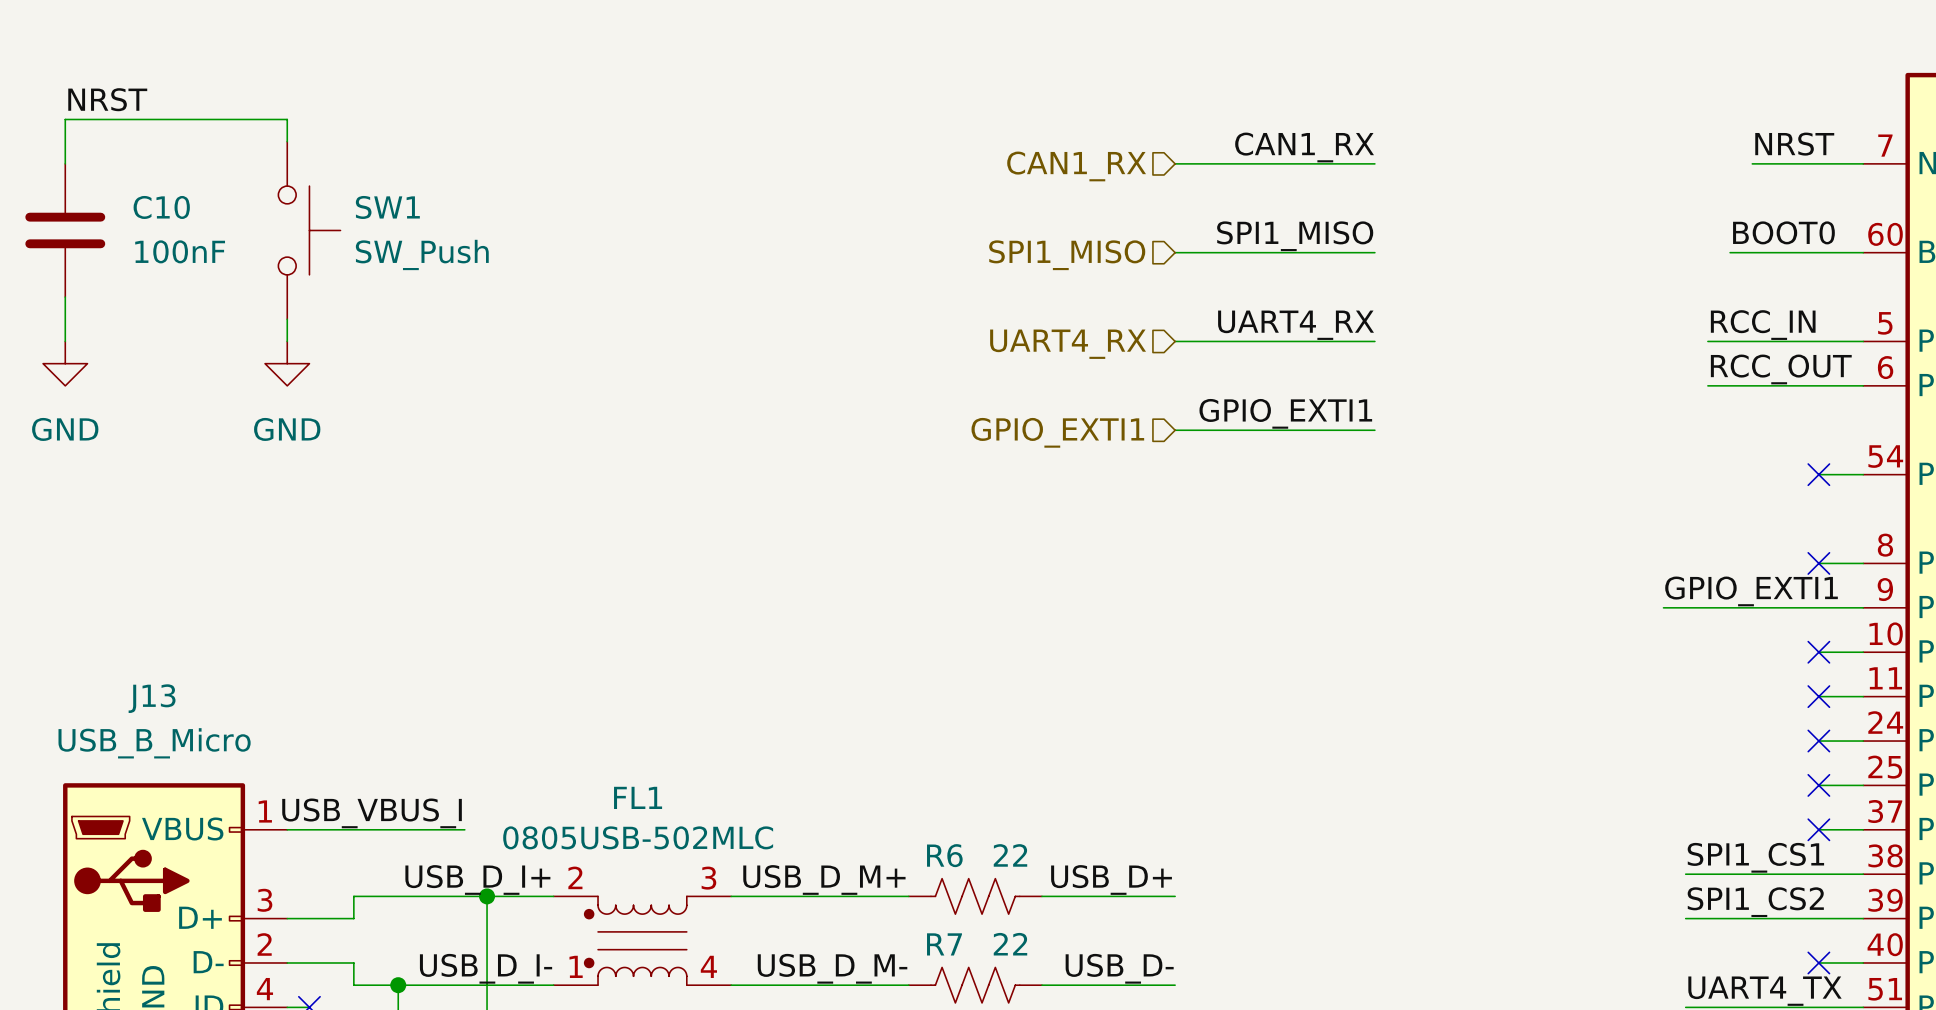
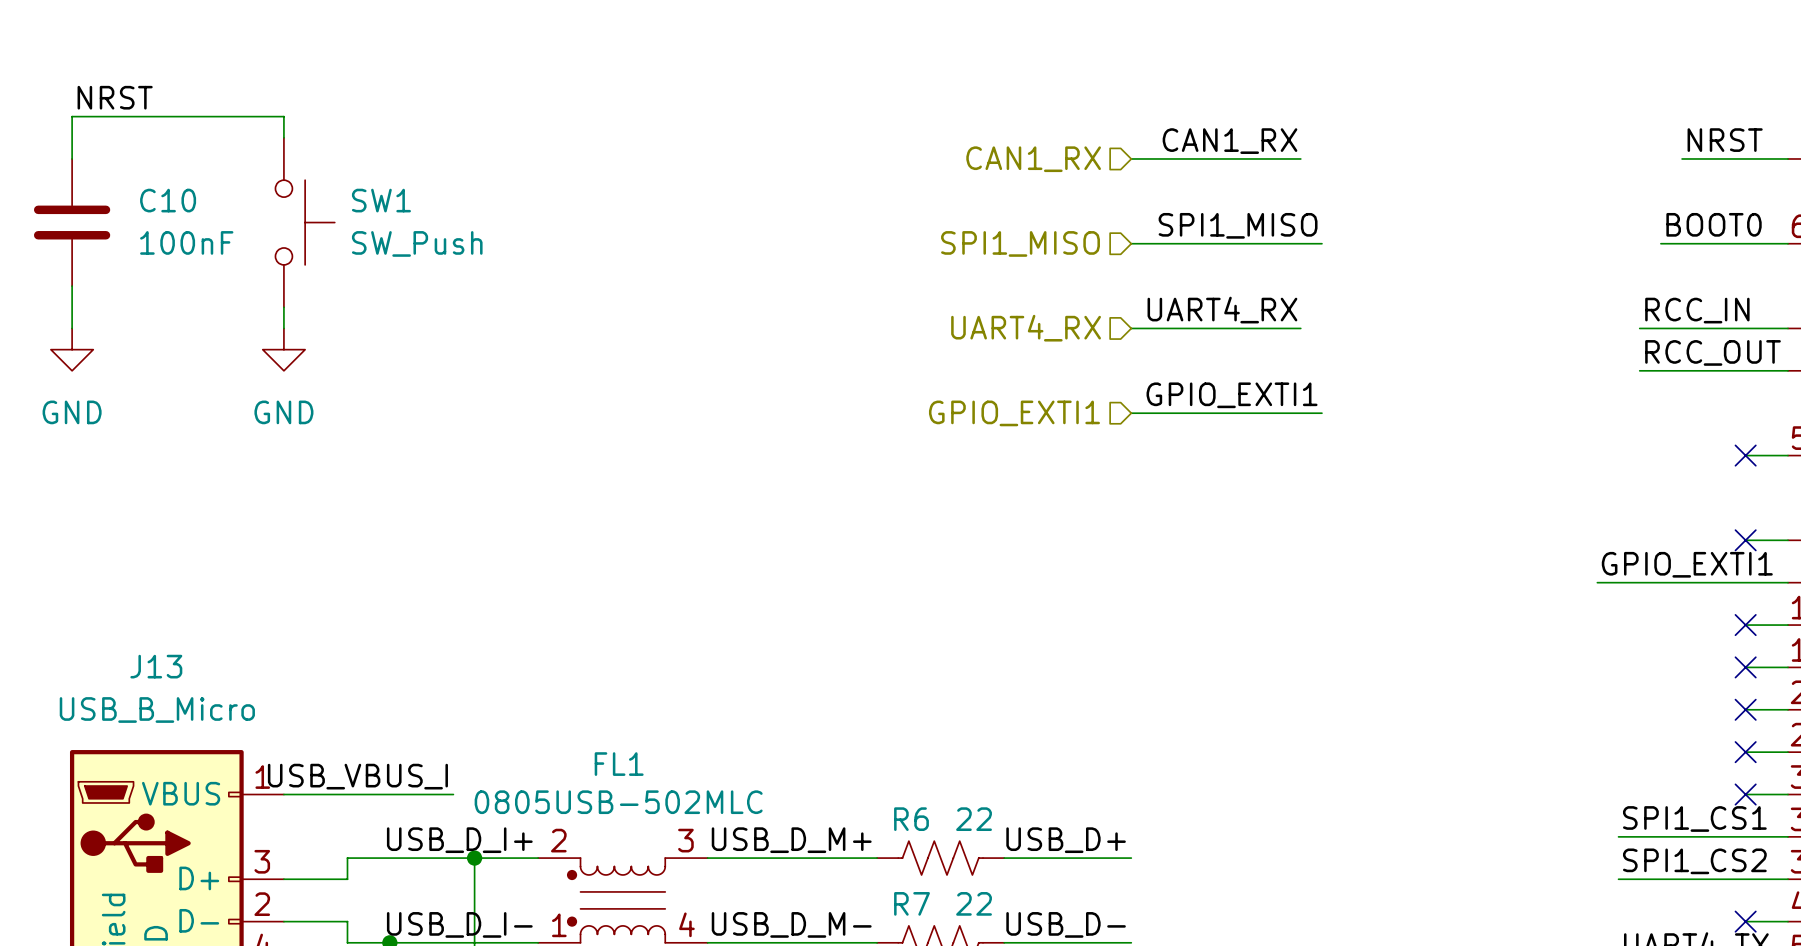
label position: CAN1_RX (1304, 147) -> CAN1_RX (1230, 141)
wire: (1352, 163) (1374, 163) -> none
label position: UART4_RX (1296, 325) -> UART4_RX (1222, 310)
wire: (1352, 341) (1374, 341) -> none

